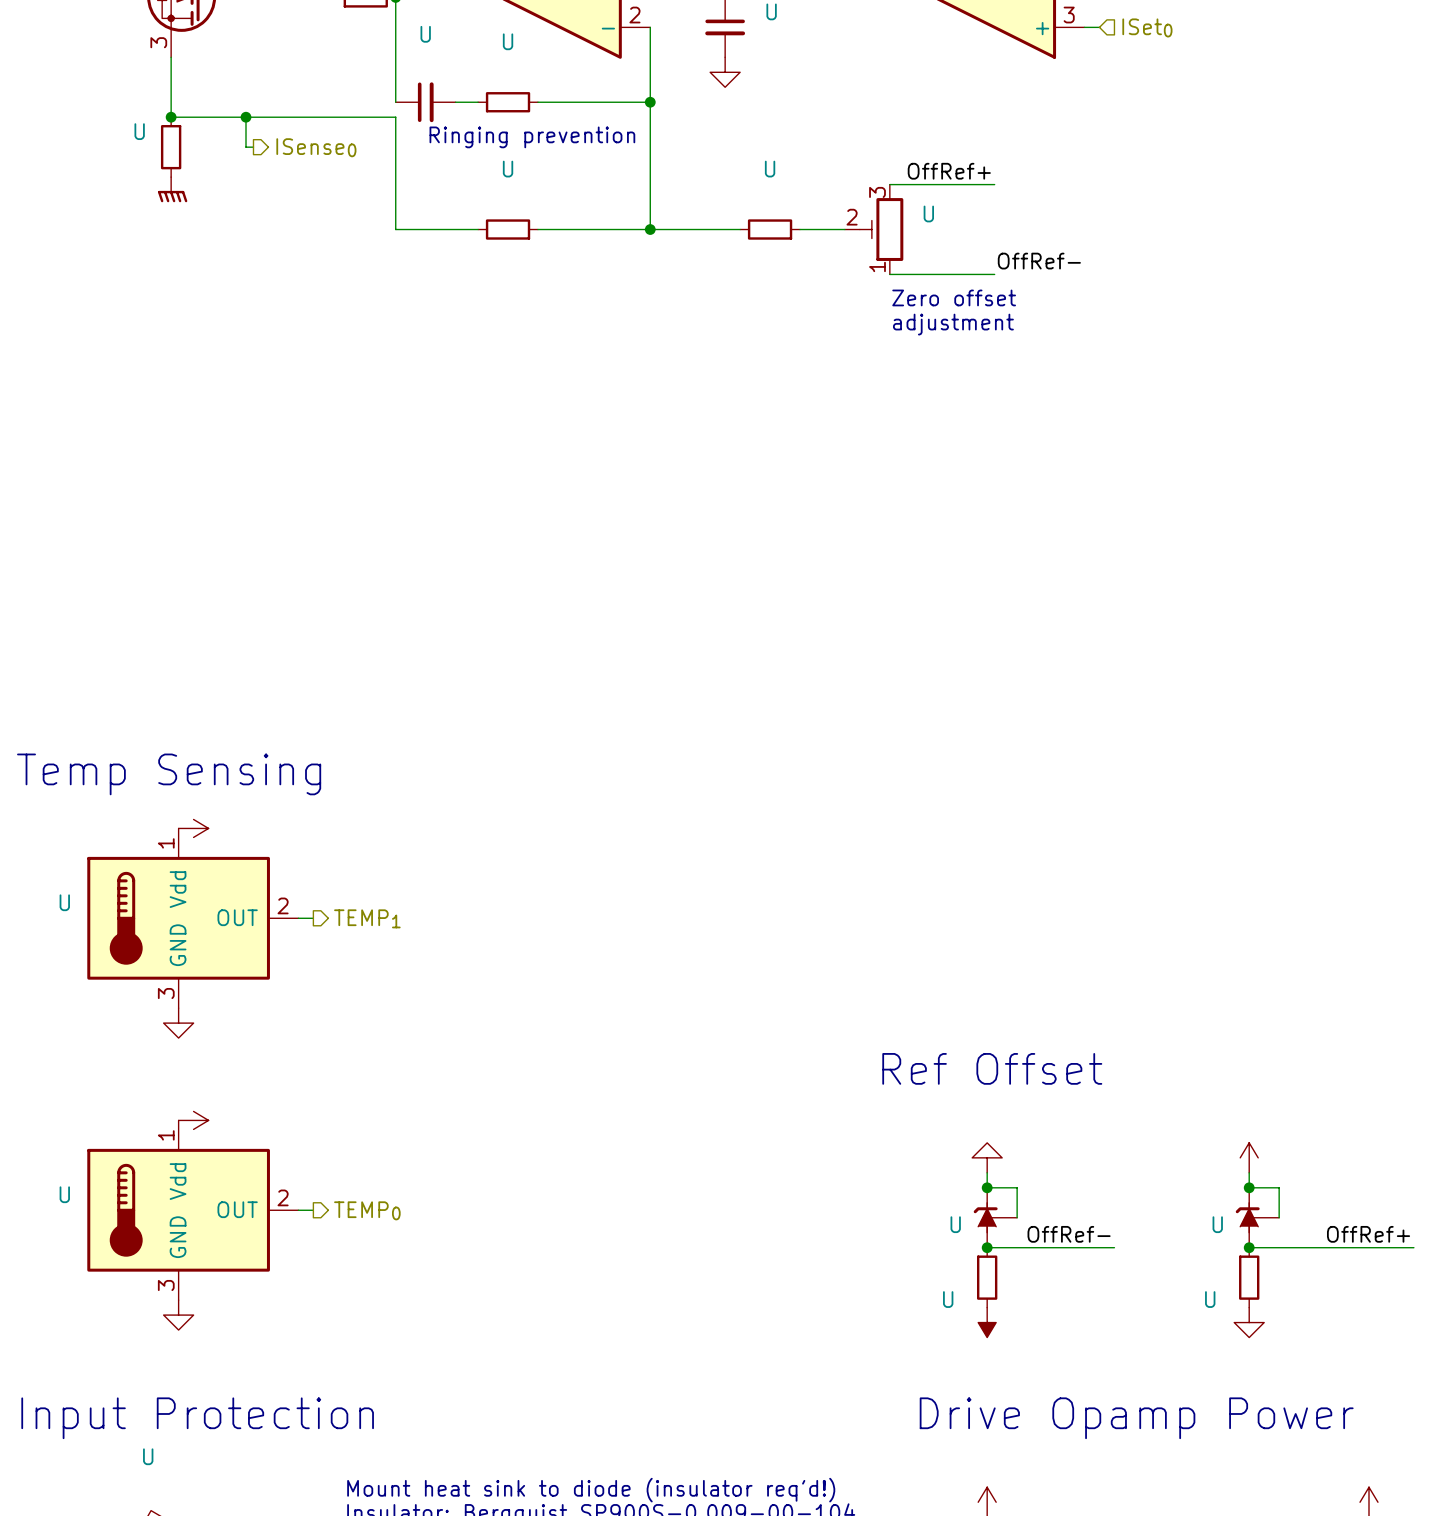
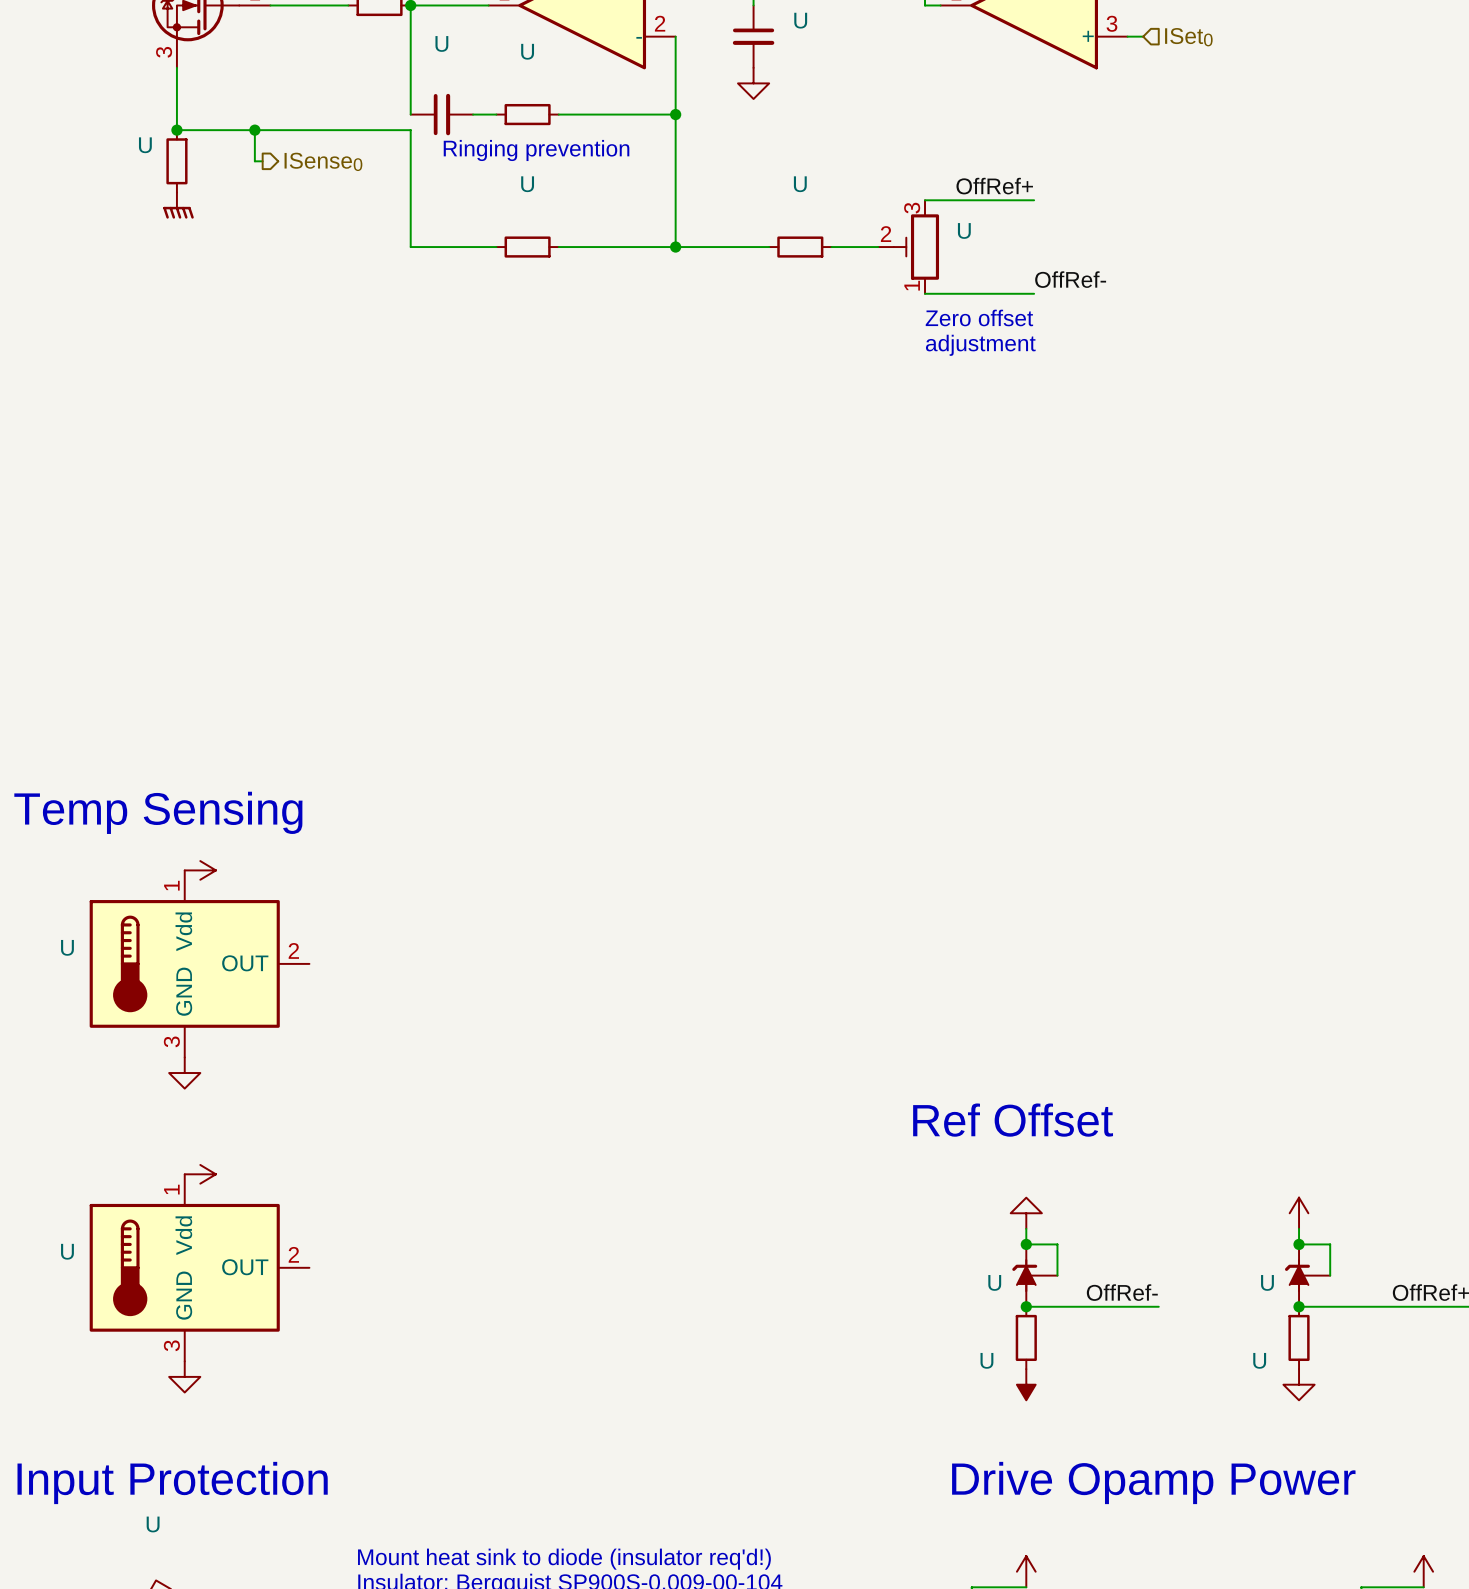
wire: (298, 918) (313, 918) -> none
hierarchical label: TEMP1 (367, 918) -> none
wire: (298, 1210) (313, 1210) -> none
hierarchical label: TEMP0 (367, 1210) -> none

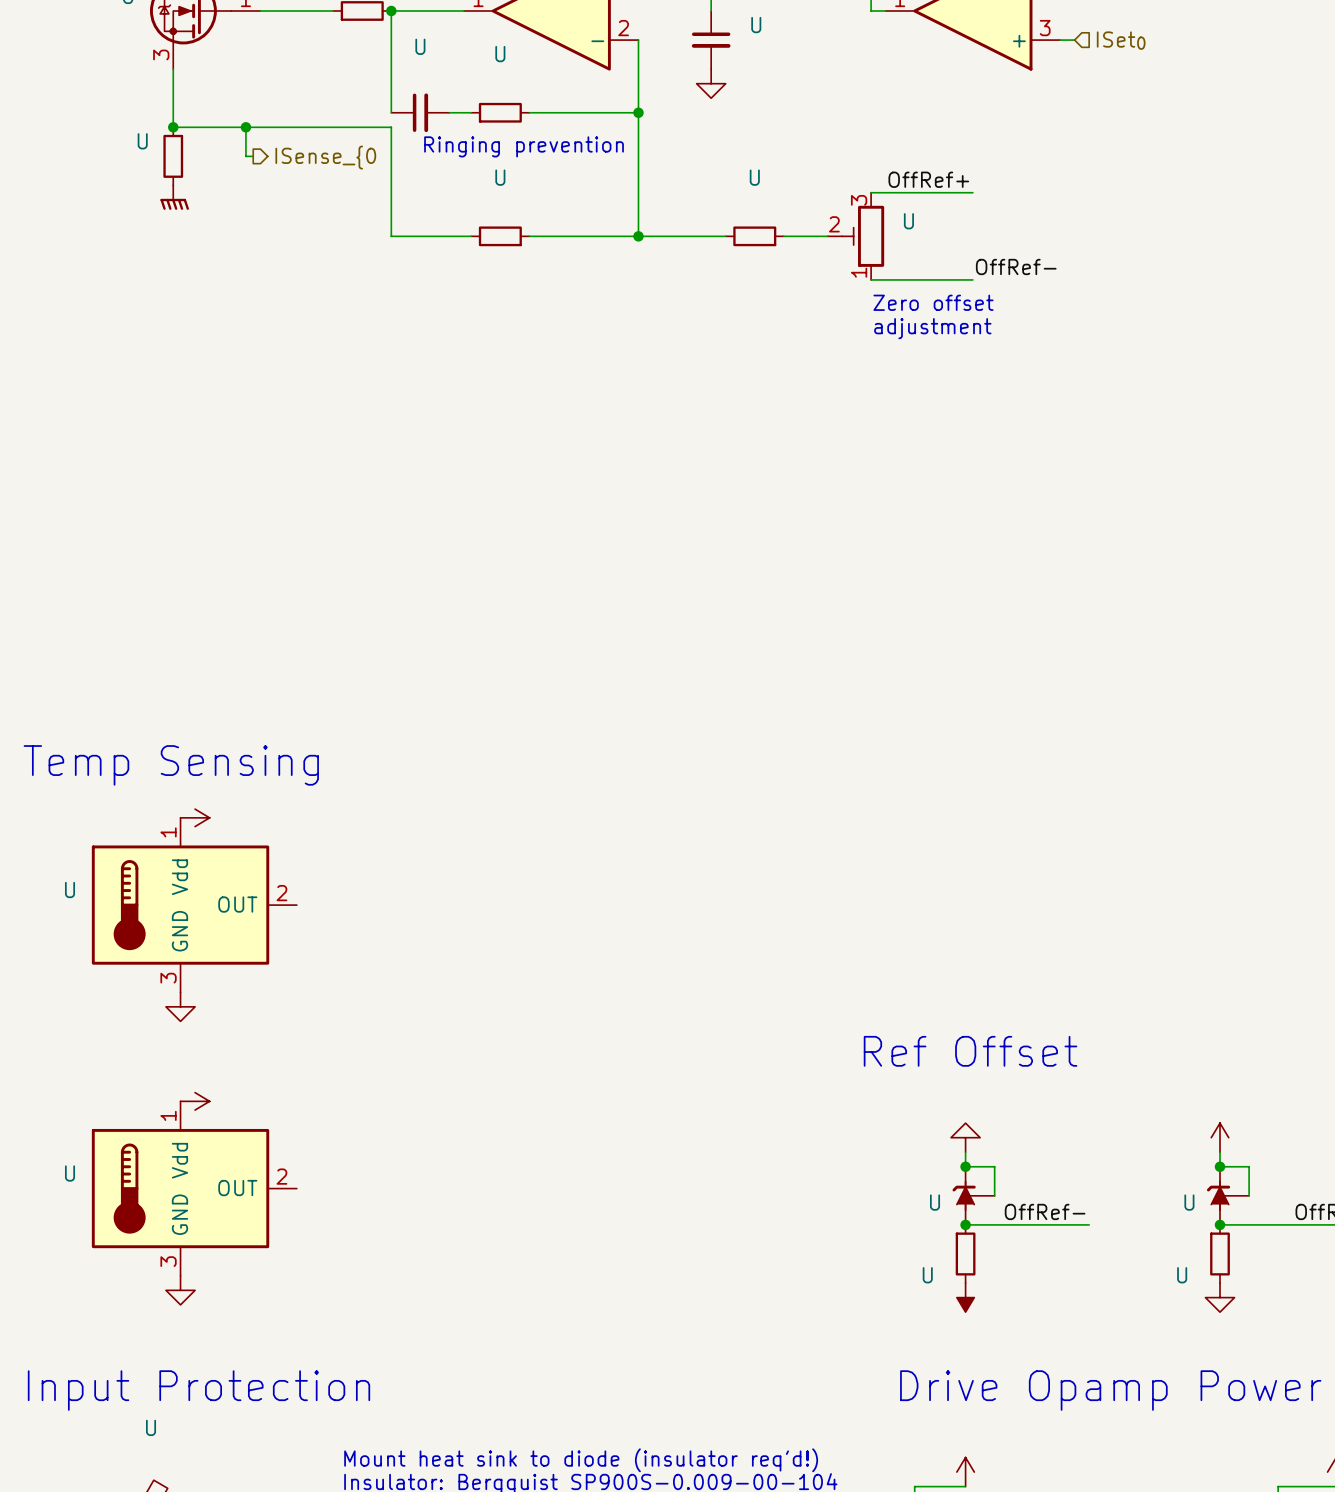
hierarchical label: ISense0 (323, 161) -> ISense_{0 (325, 157)

